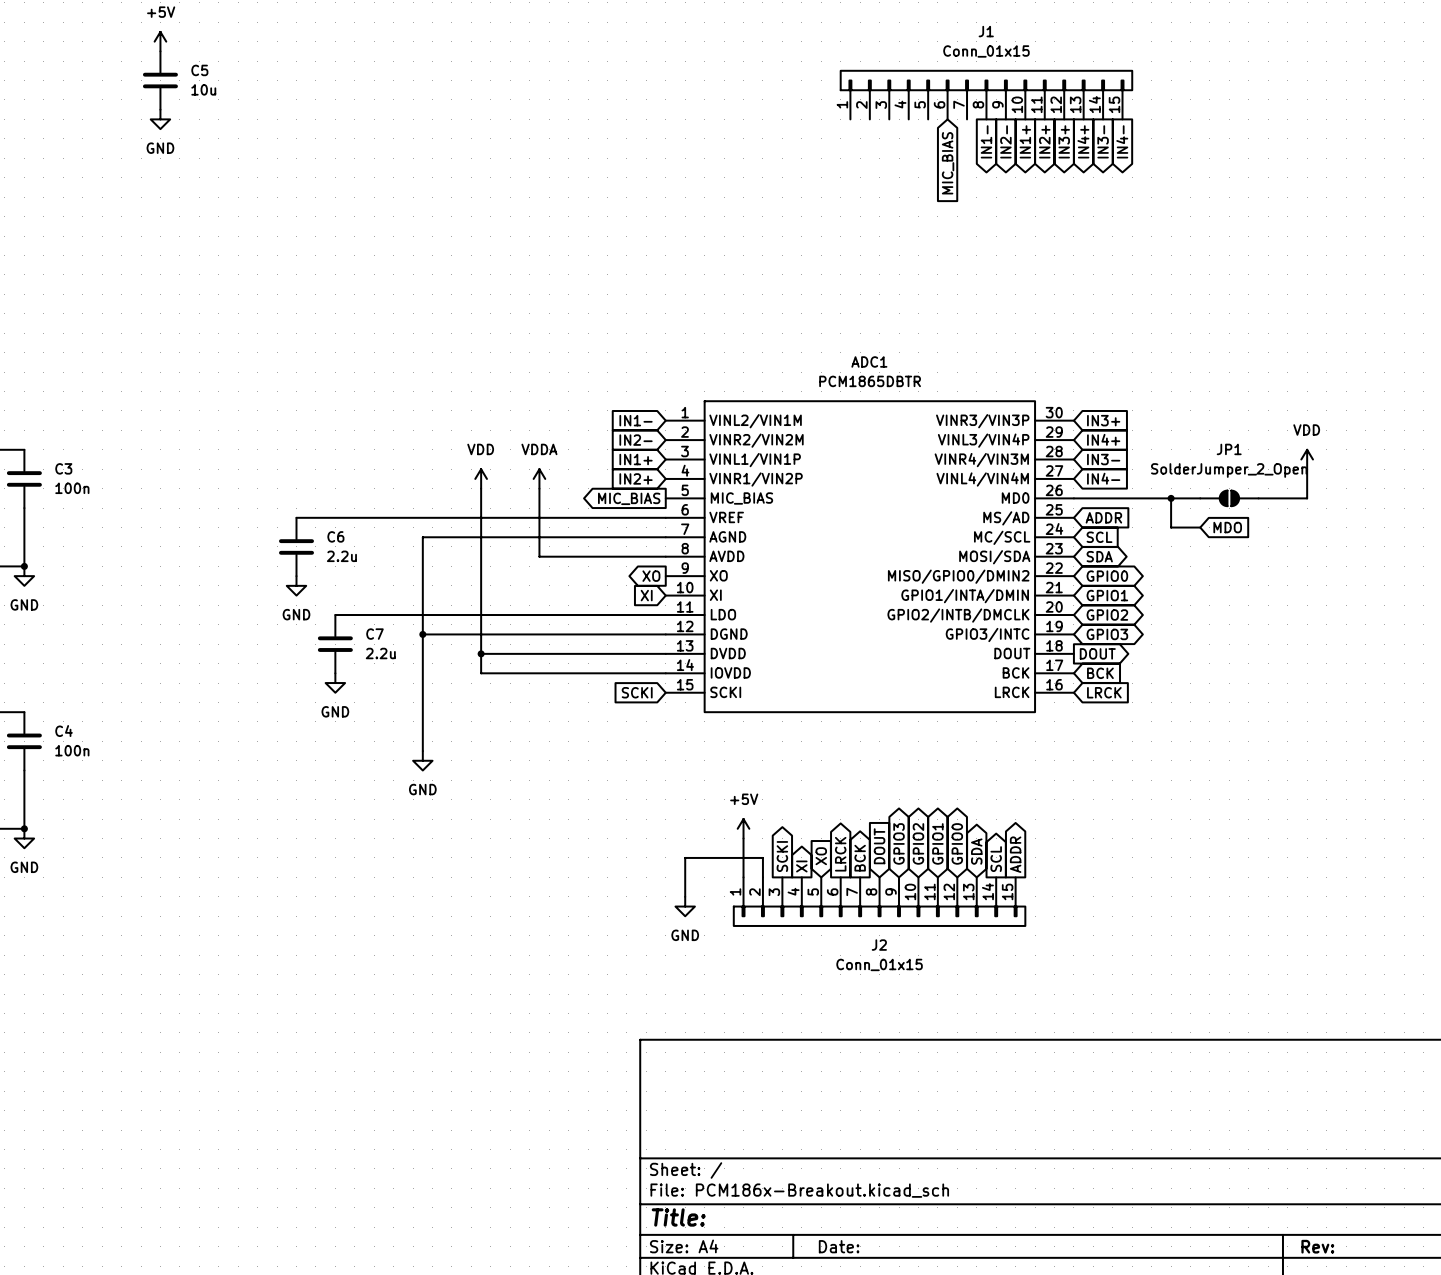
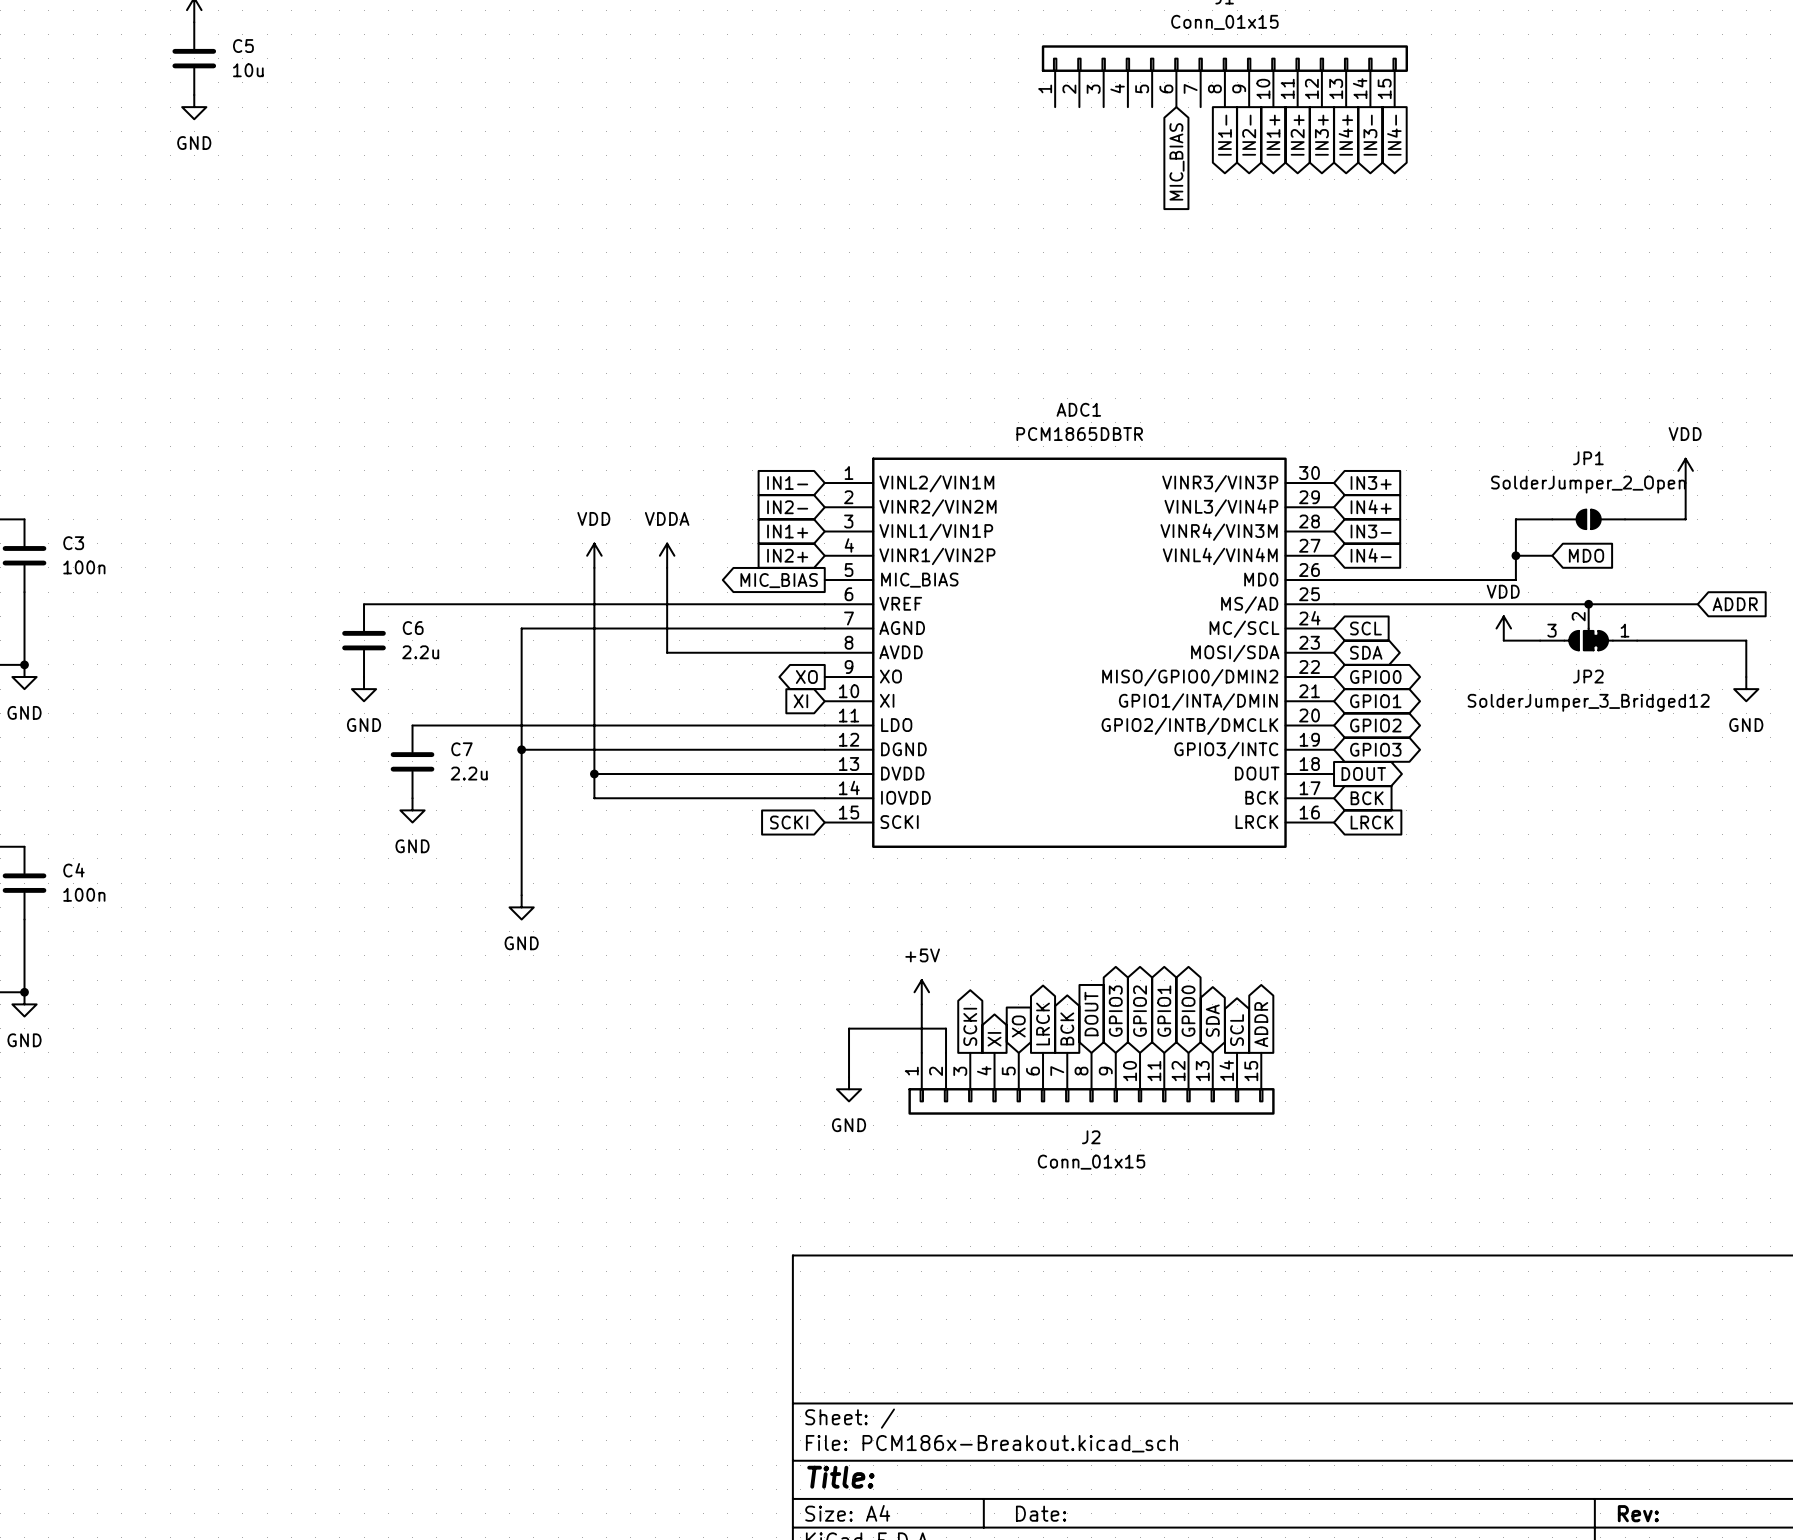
power symbol: none -> VDD (1685, 470)
wire: none -> (1552, 519) (1515, 519) (1515, 580) (1491, 580)
power symbol: VDD (1307, 459) -> none
wire: (1307, 469) (1307, 498) (1258, 498) -> (1685, 483) (1685, 519) (1625, 519)
wire: none -> (1515, 555) (1552, 555)
junction: none -> (1515, 555)
wire: (1171, 498) (1171, 527) (1200, 527) -> none
junction: (1171, 498) -> none
JP1 position: (1229, 498) -> (1588, 519)
wire: none -> (1334, 604) (1697, 604)
global label: ADDR (1103, 517) -> none
junction: none -> (1588, 604)
global label: none -> ADDR (1735, 604)
global label position: MDO (1227, 527) -> MDO (1586, 555)
JP2: none -> SolderJumper_3_Bridged12 (1588, 627)
power symbol: none -> VDD (1503, 628)
wire: none -> (1503, 640) (1540, 640)
wire: none -> (1637, 640) (1746, 640) (1746, 677)
power symbol: none -> GND (1746, 689)

